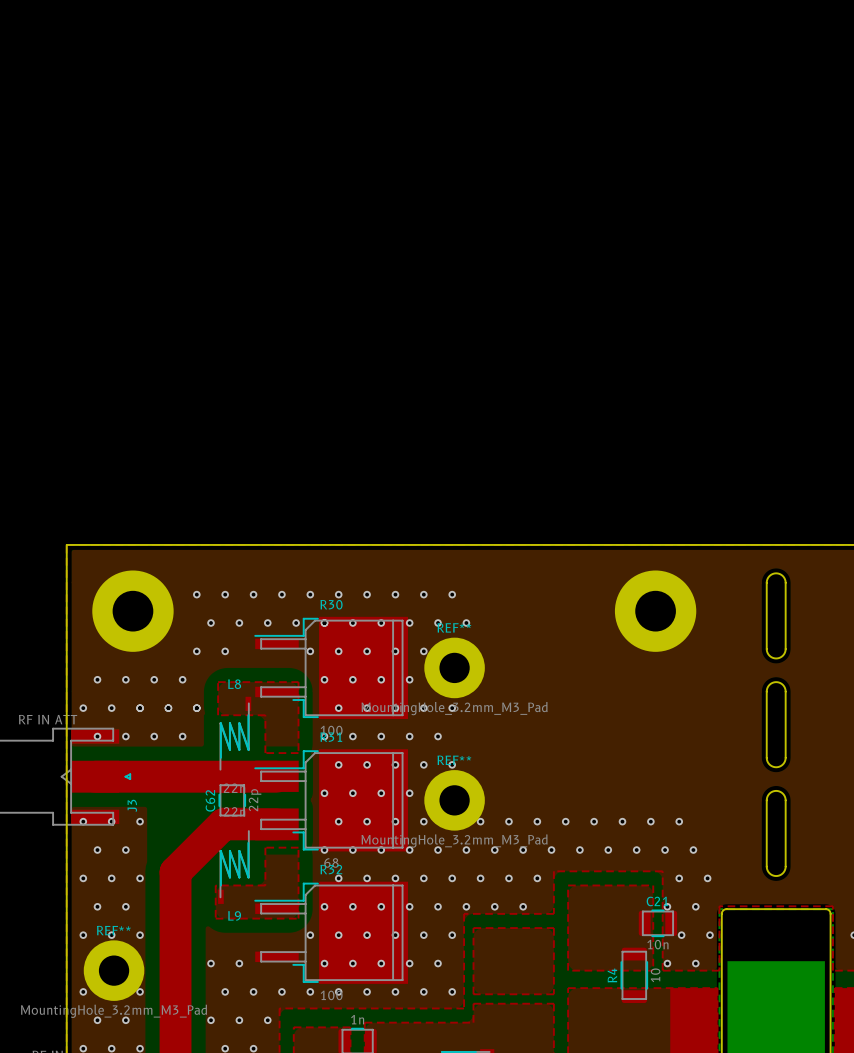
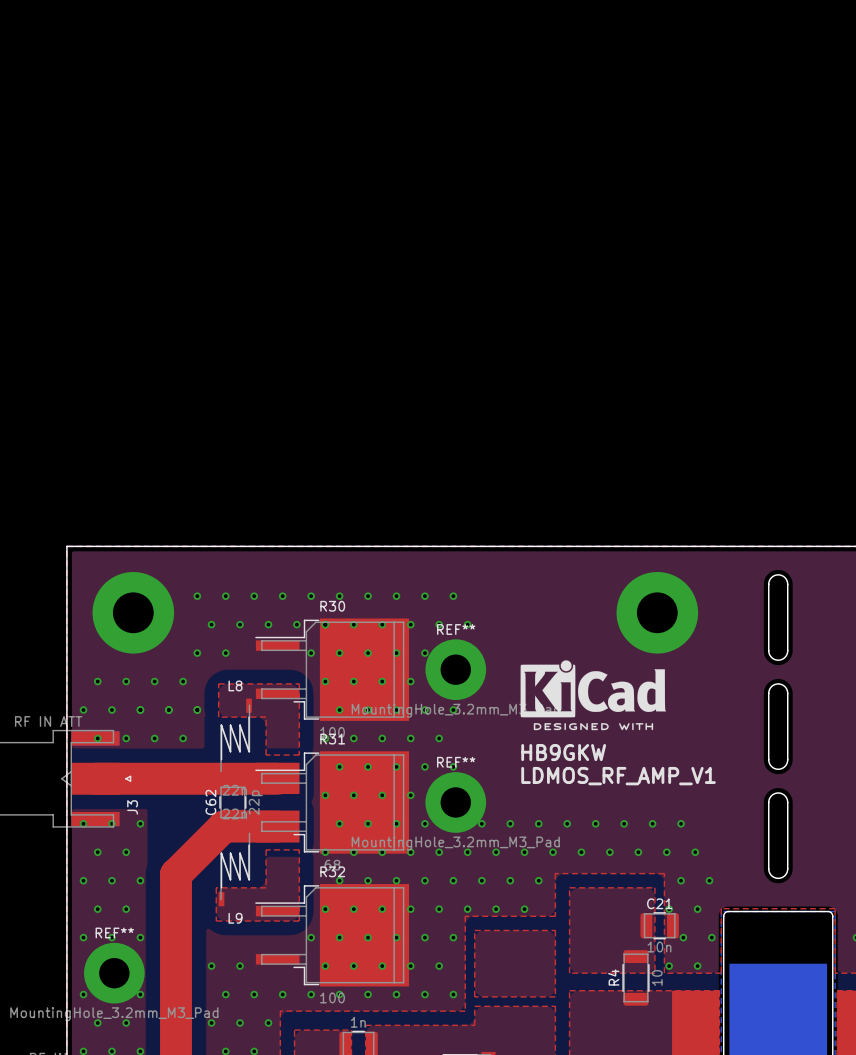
drawing: none -> [520, 660, 667, 731]
text: none -> HB9GKW (563, 752)
text: none -> LDMOS_RF_AMP_V1 (618, 776)

